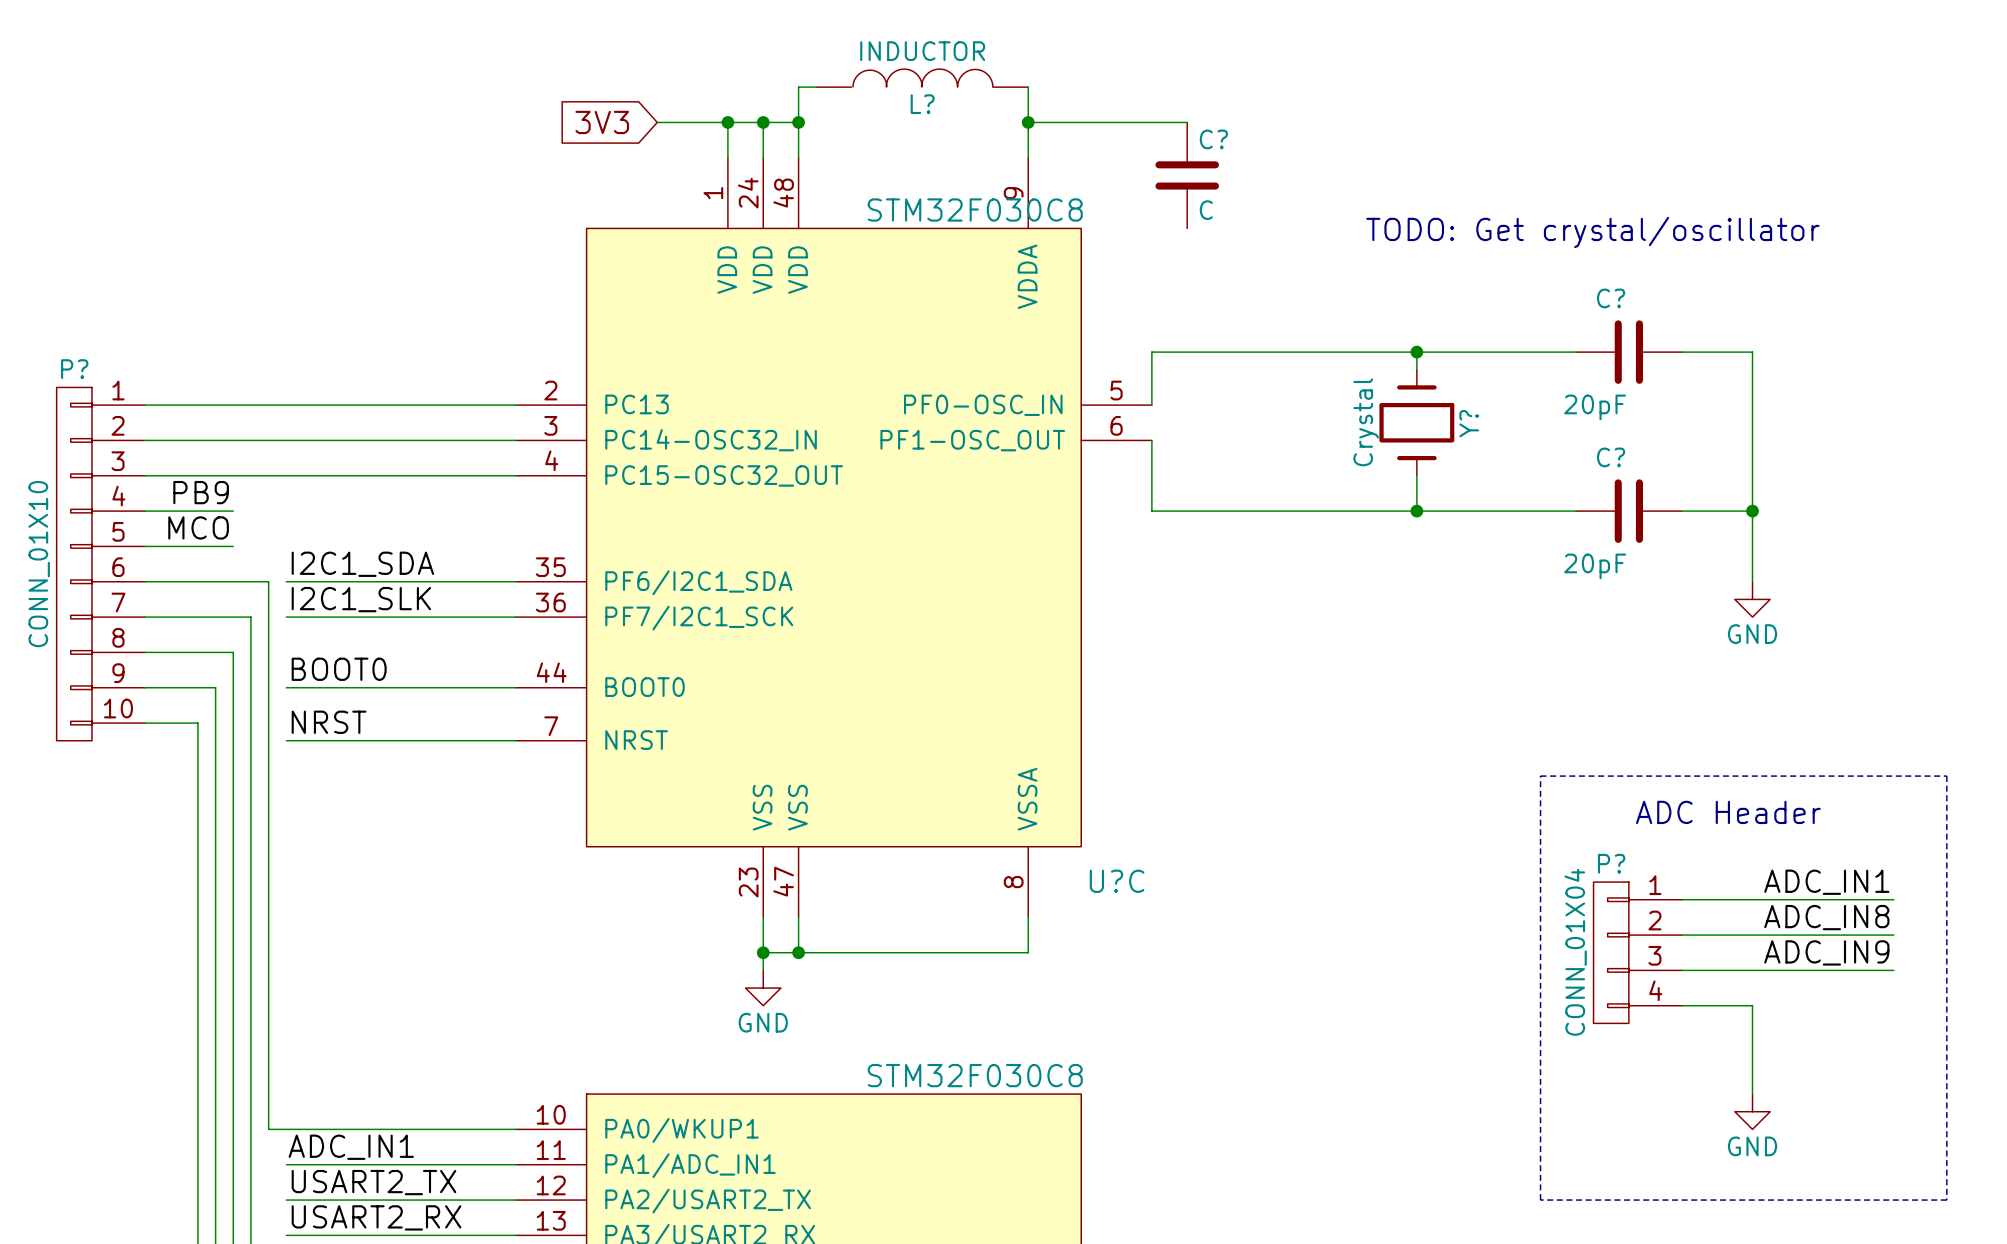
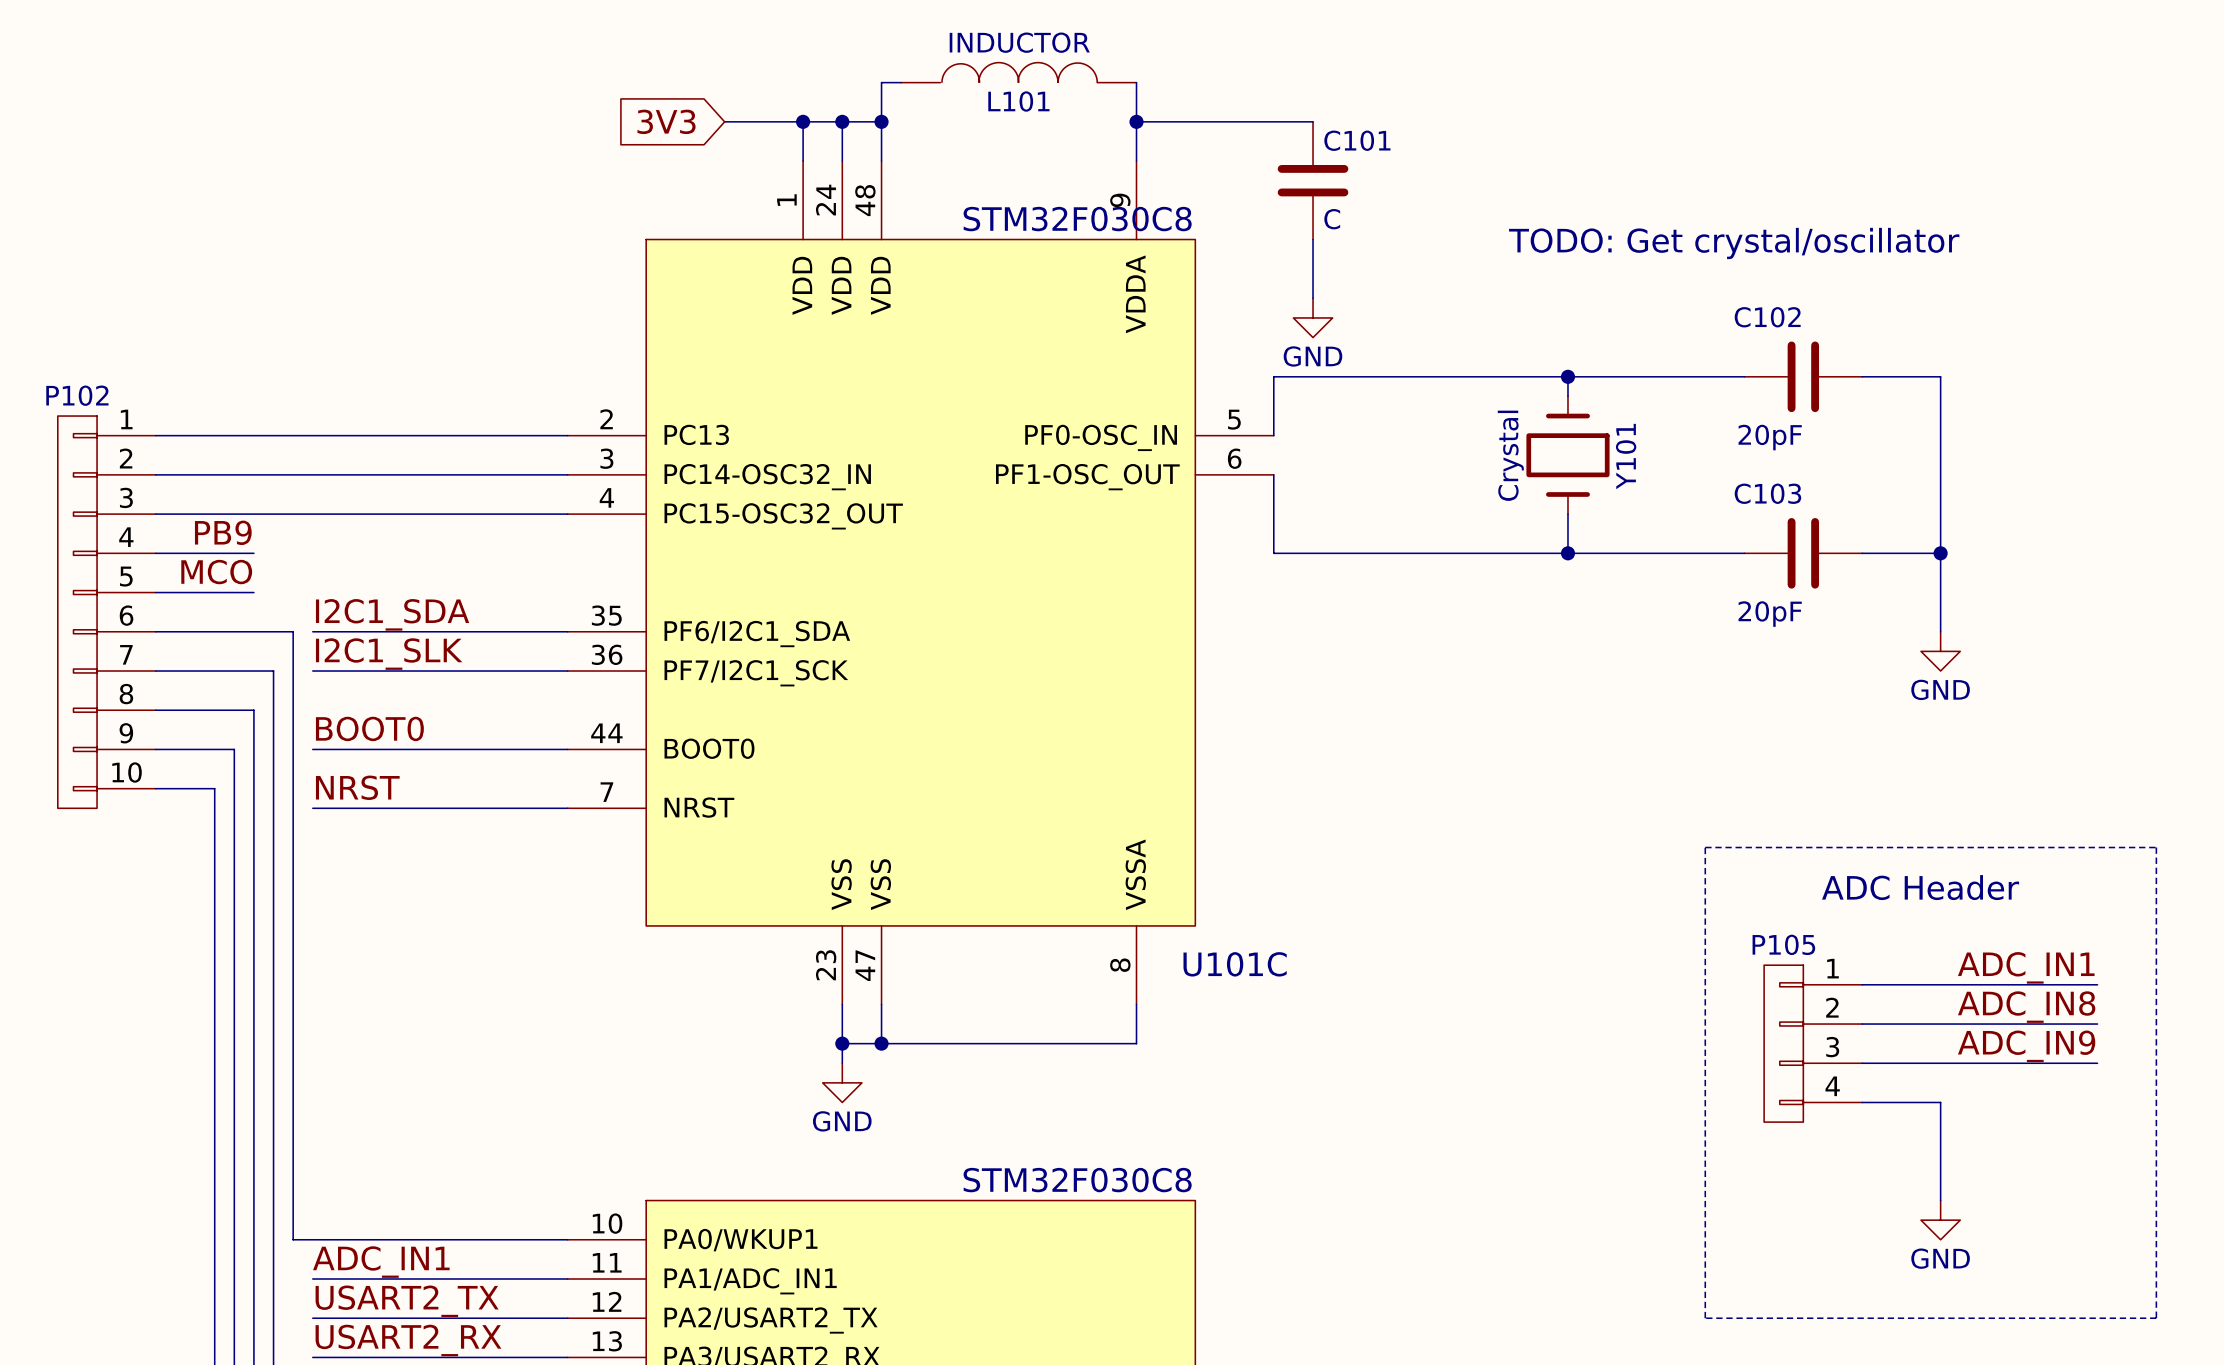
L? name: L? (922, 104) -> L101 (1018, 101)
C? name: C? (1213, 139) -> C101 (1357, 140)
wire: none -> (1313, 239) (1313, 298)
C? name: C? (1611, 298) -> C102 (1767, 317)
power symbol: none -> GND (1313, 317)
P? name: P? (74, 369) -> P102 (77, 395)
Y? name: Y? (1469, 423) -> Y101 (1626, 456)
C? name: C? (1611, 457) -> C103 (1767, 493)
P? value: CONN_01X10 (39, 564) -> none
P? name: P? (1611, 863) -> P105 (1783, 944)
U?C name: U?C (1117, 881) -> U101C (1235, 964)
P? value: CONN_01X04 (1575, 952) -> none

